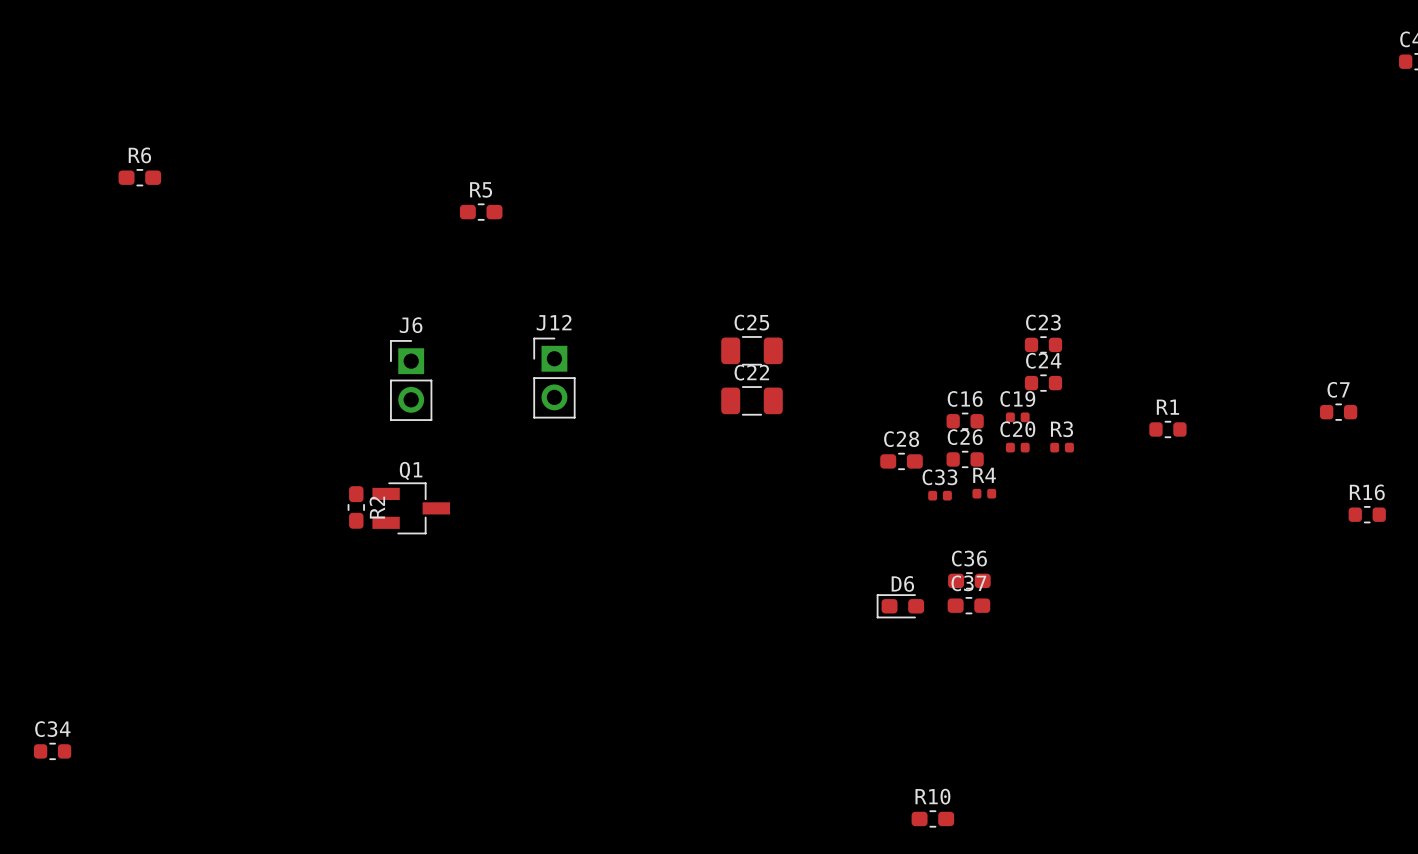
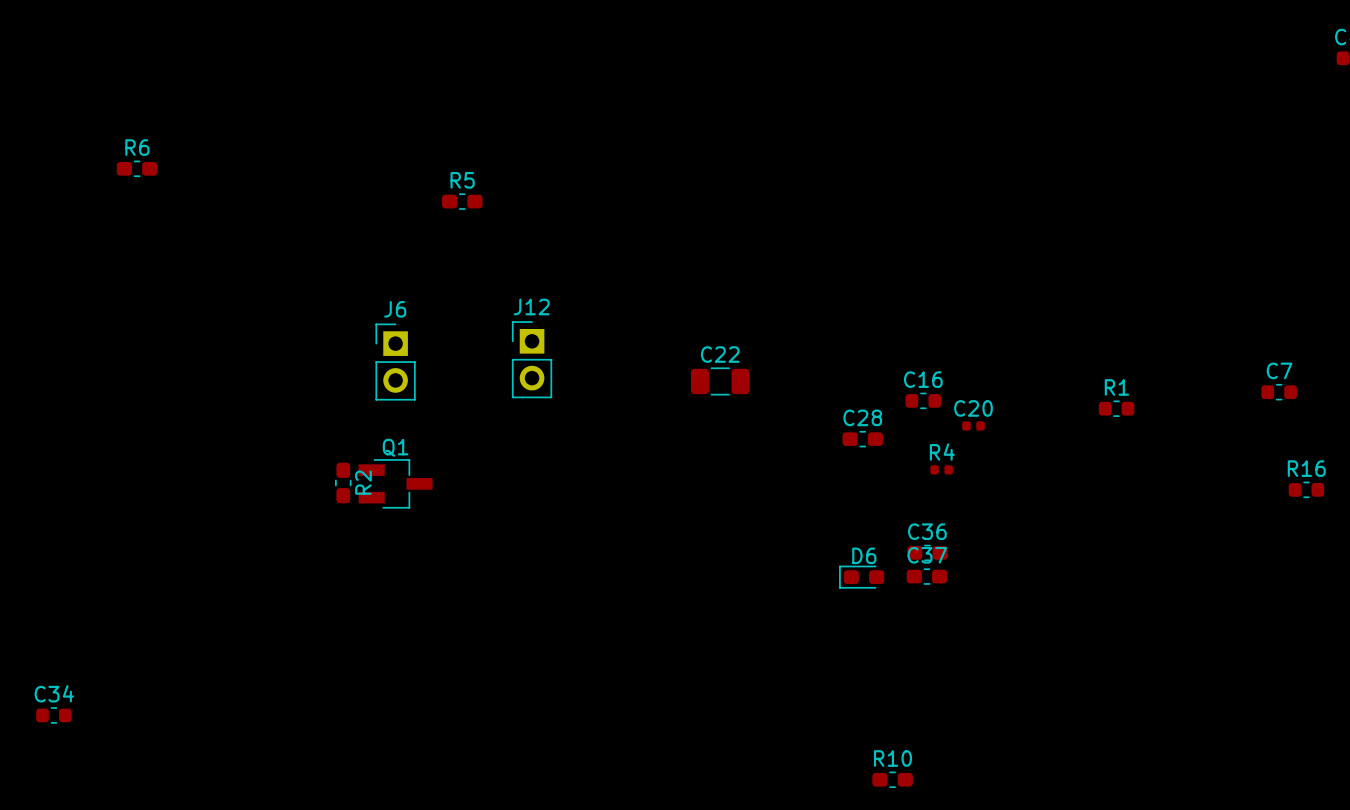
C23: (1043, 344) -> none
C25: (751, 350) -> none
C24: (1043, 383) -> none
C19: (1017, 417) -> none
R3: (1062, 447) -> none
C26: (965, 459) -> none
C33: (940, 495) -> none

